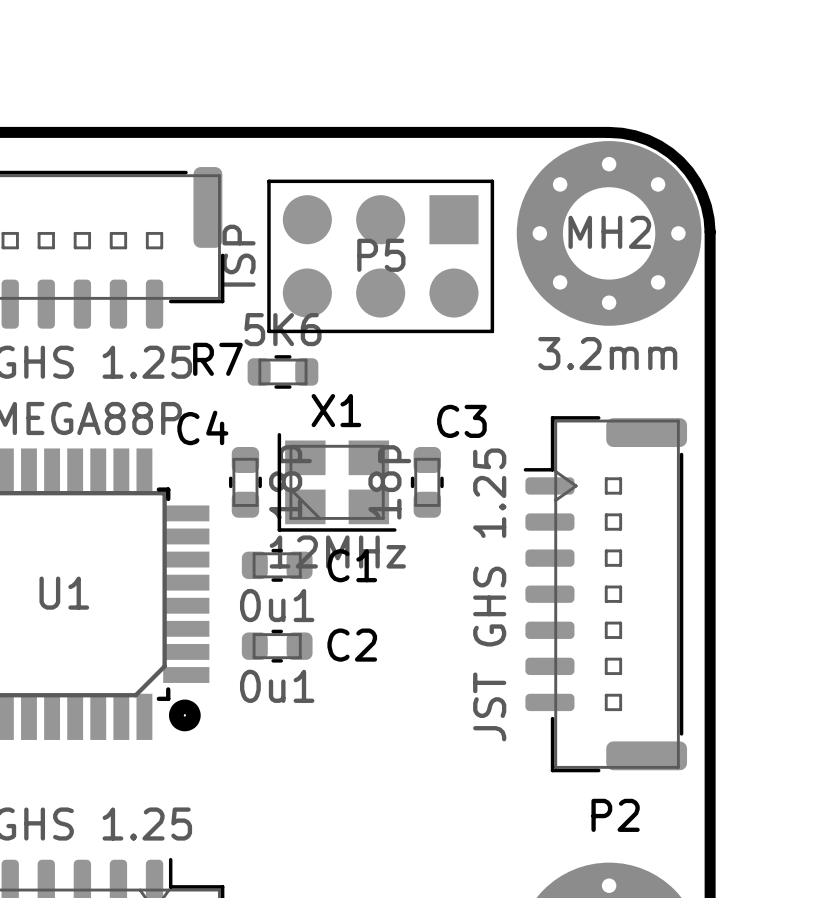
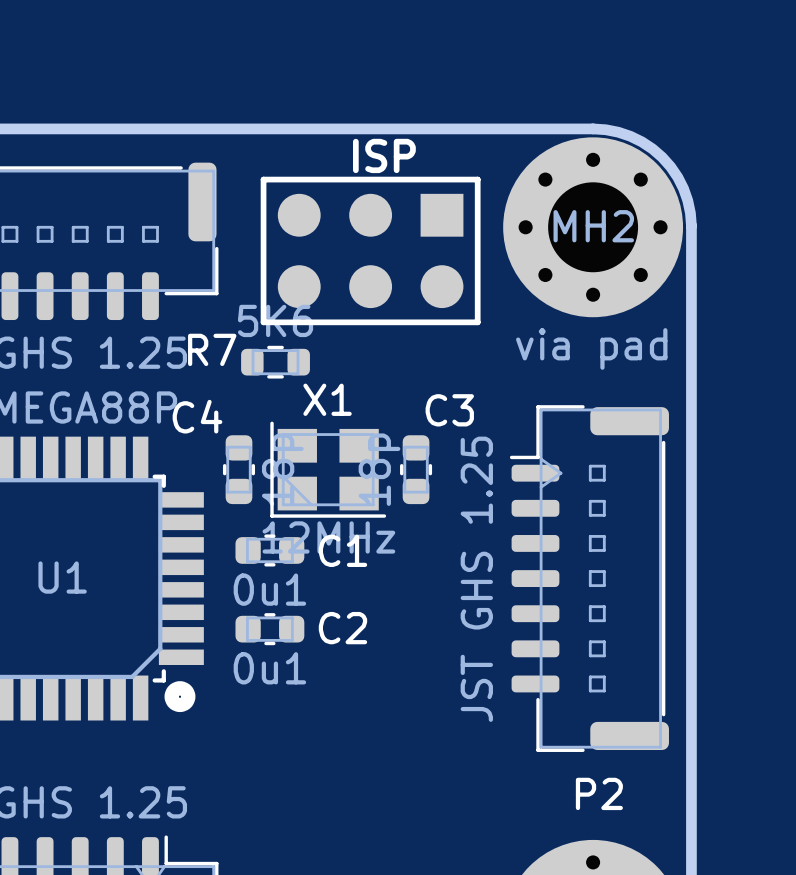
P5: ISP (380, 256) -> none
part: none -> ISP (370, 250)
MH2 value: 3.2mm (607, 353) -> via pad (591, 348)

